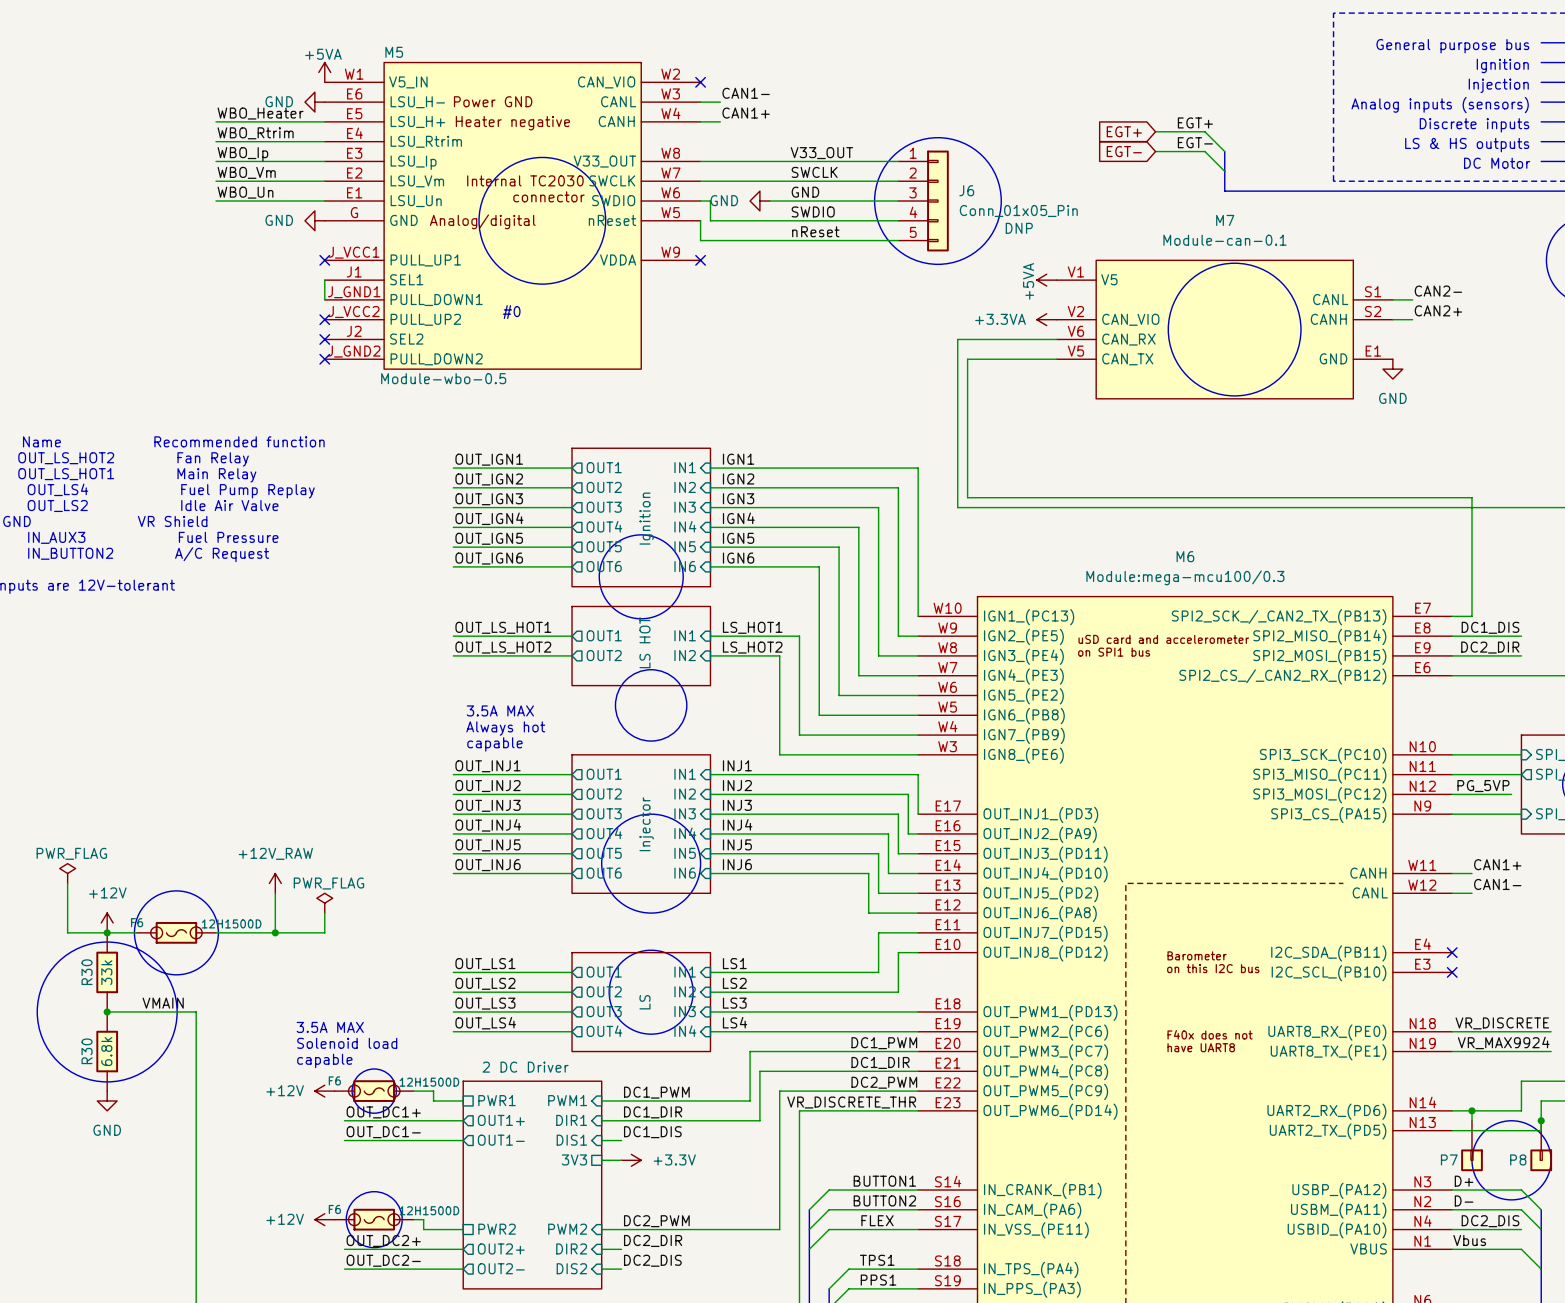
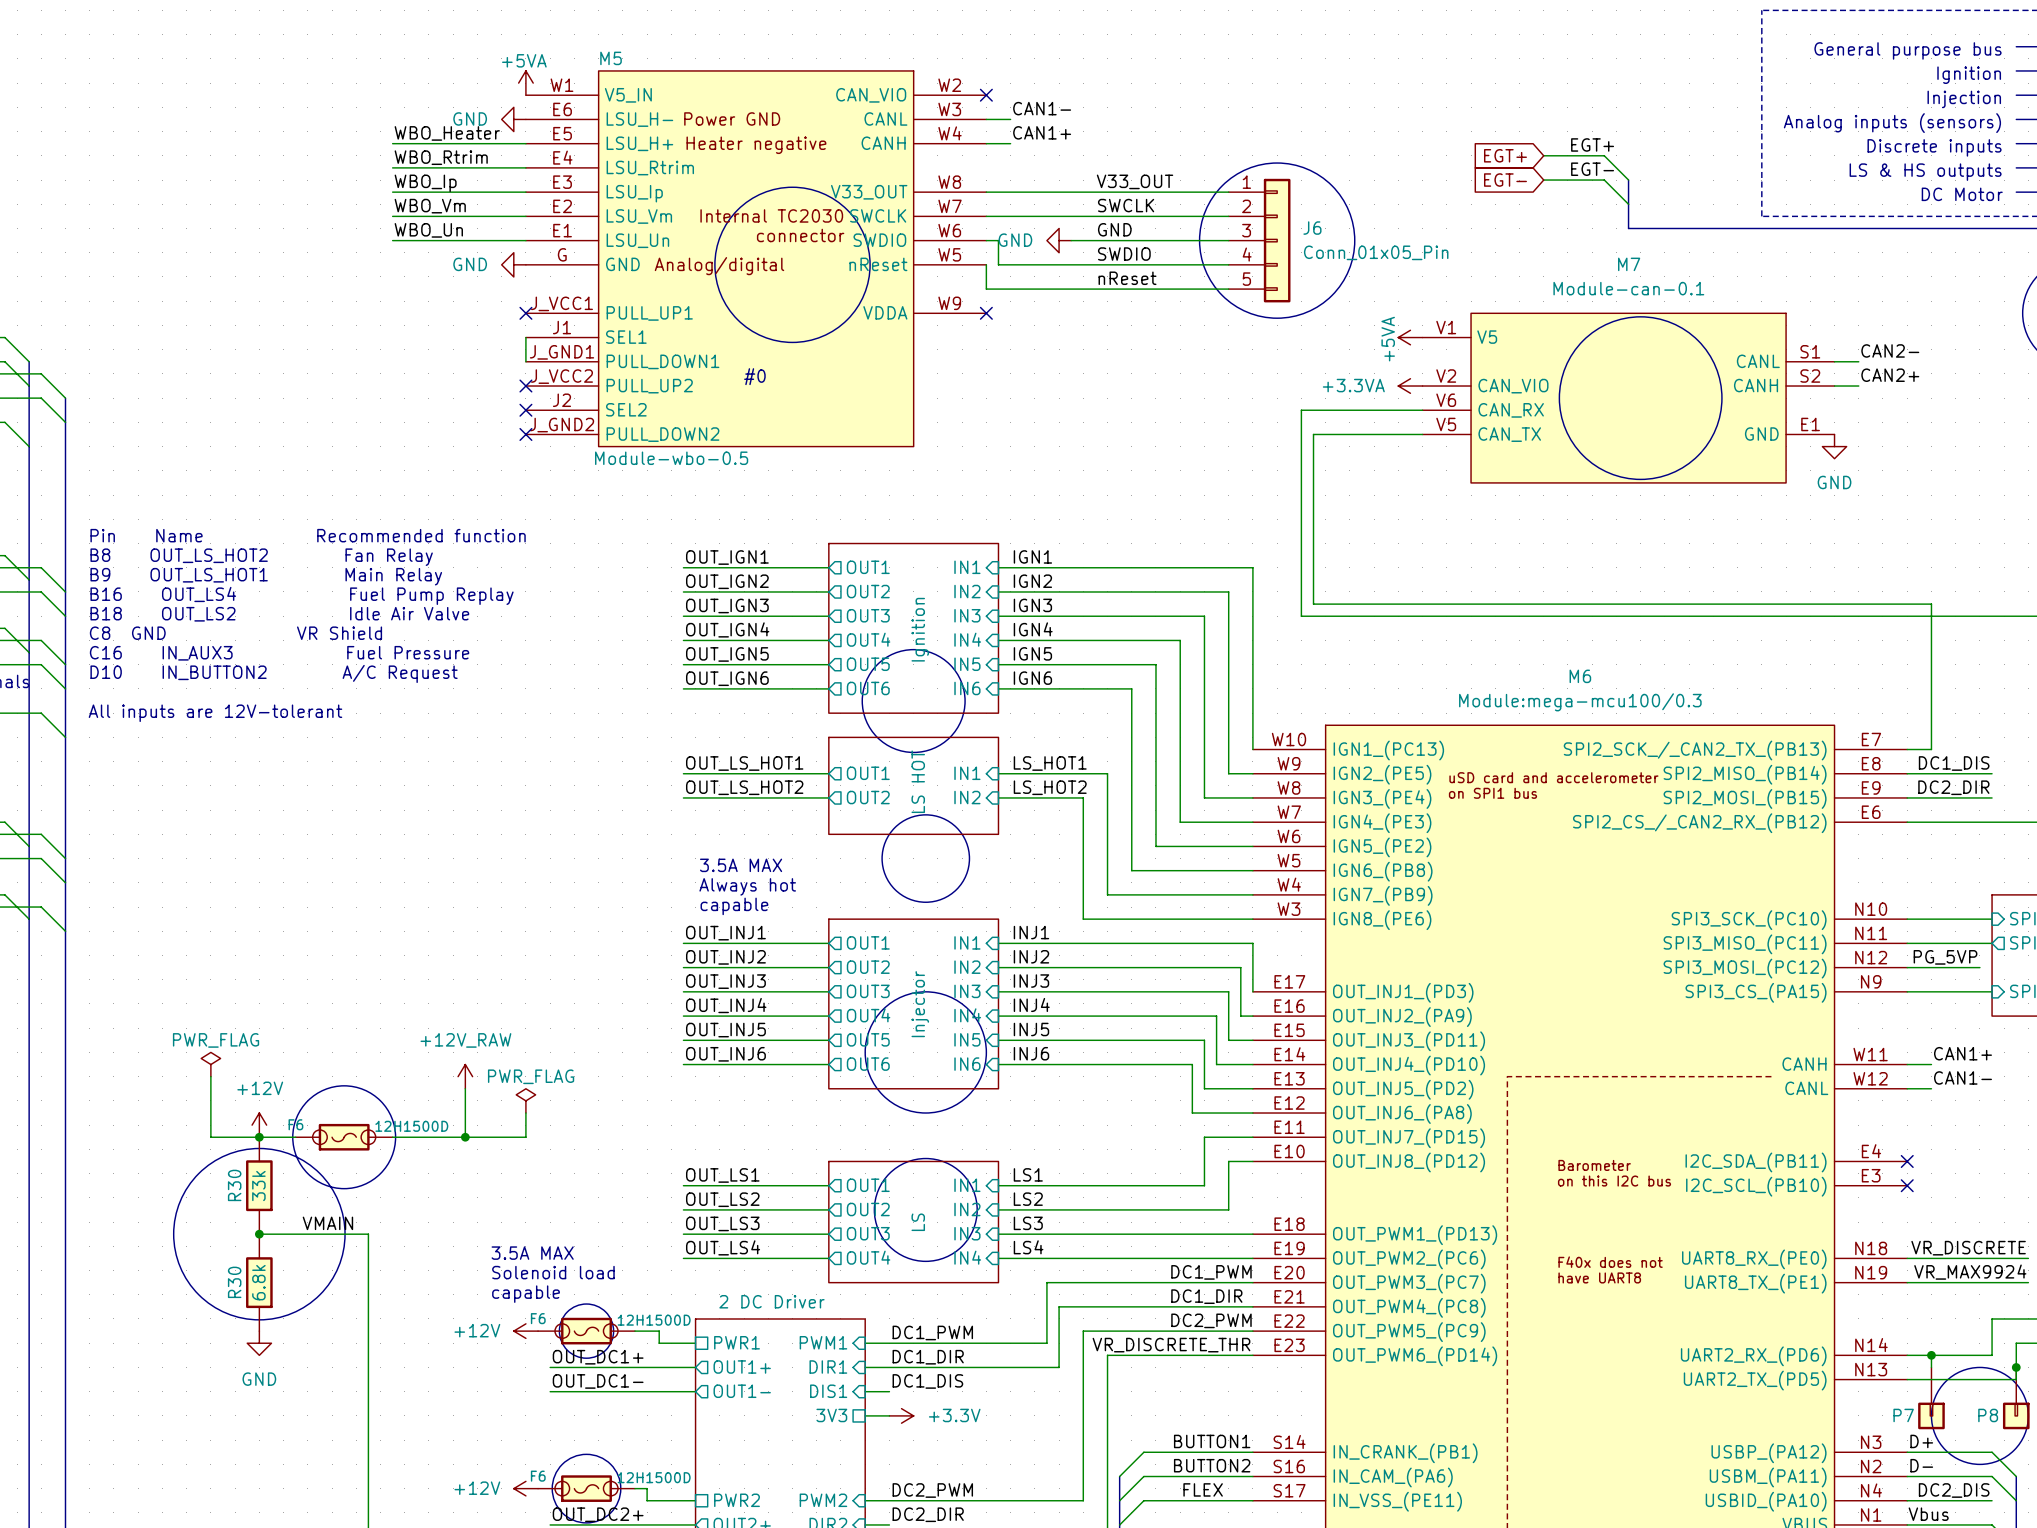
J6 text: DNP (1019, 228) -> none

